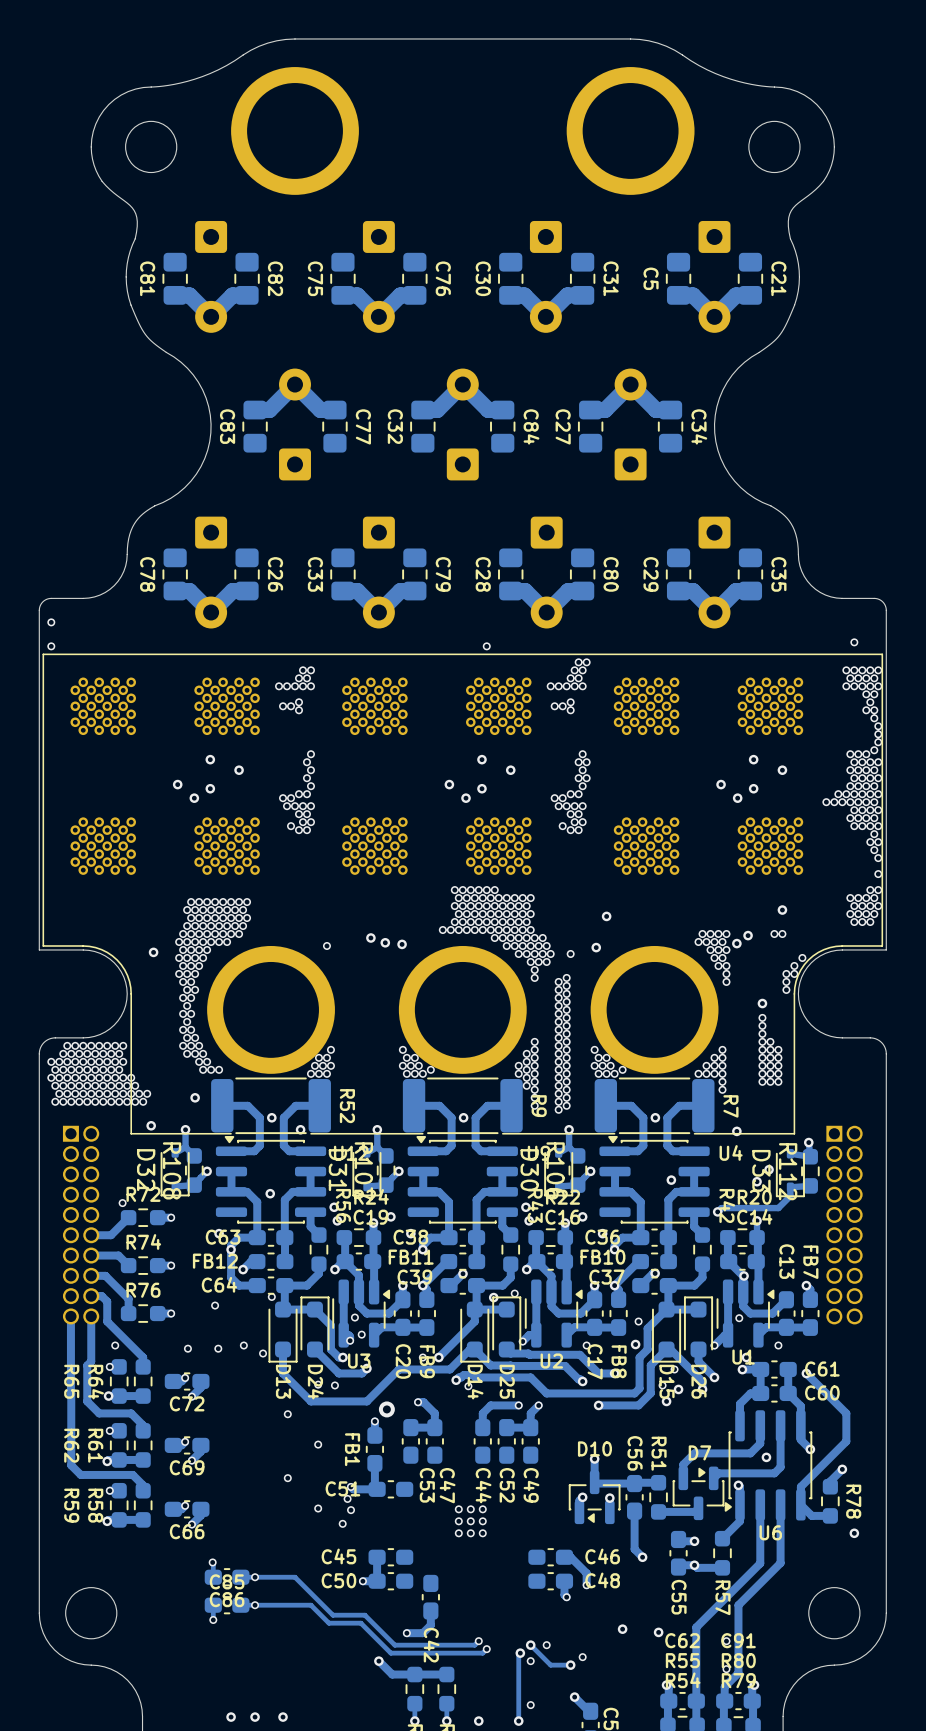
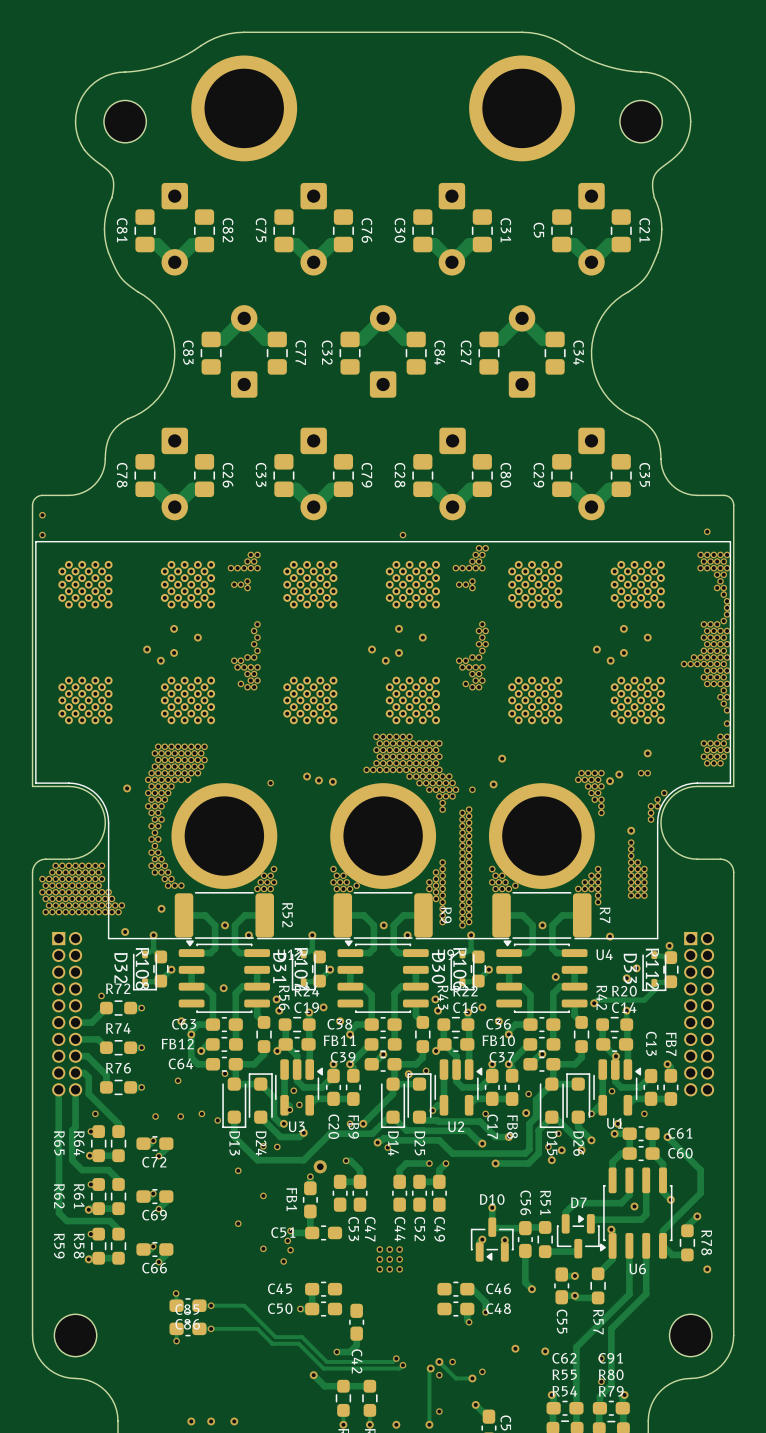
via: none -> (442, 922)
via: none -> (469, 922)
via: none -> (462, 925)
via: none -> (407, 935)

